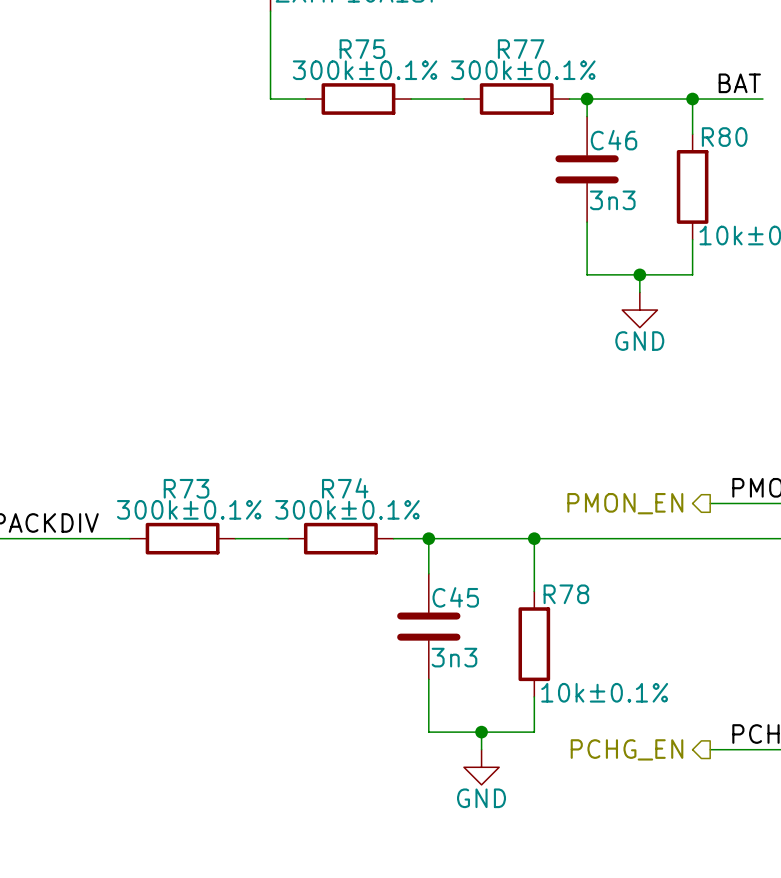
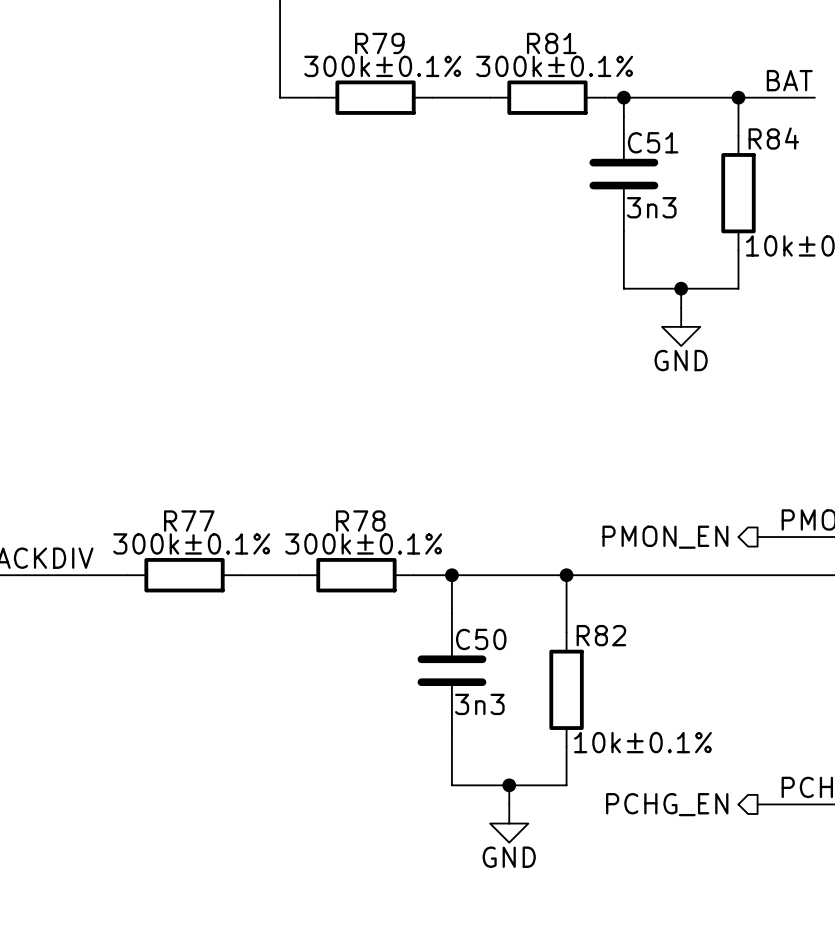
R75 name: R75 (362, 49) -> R79 (379, 43)
R77 name: R77 (521, 49) -> R81 (551, 43)
R80 name: R80 (724, 137) -> R84 (773, 138)
C46 name: C46 (614, 140) -> C51 (653, 142)
R73 name: R73 (186, 488) -> R77 (189, 521)
R74 name: R74 (345, 488) -> R78 (360, 521)
R78 name: R78 (566, 594) -> R82 (601, 635)
C45 name: C45 (455, 597) -> C50 (481, 639)

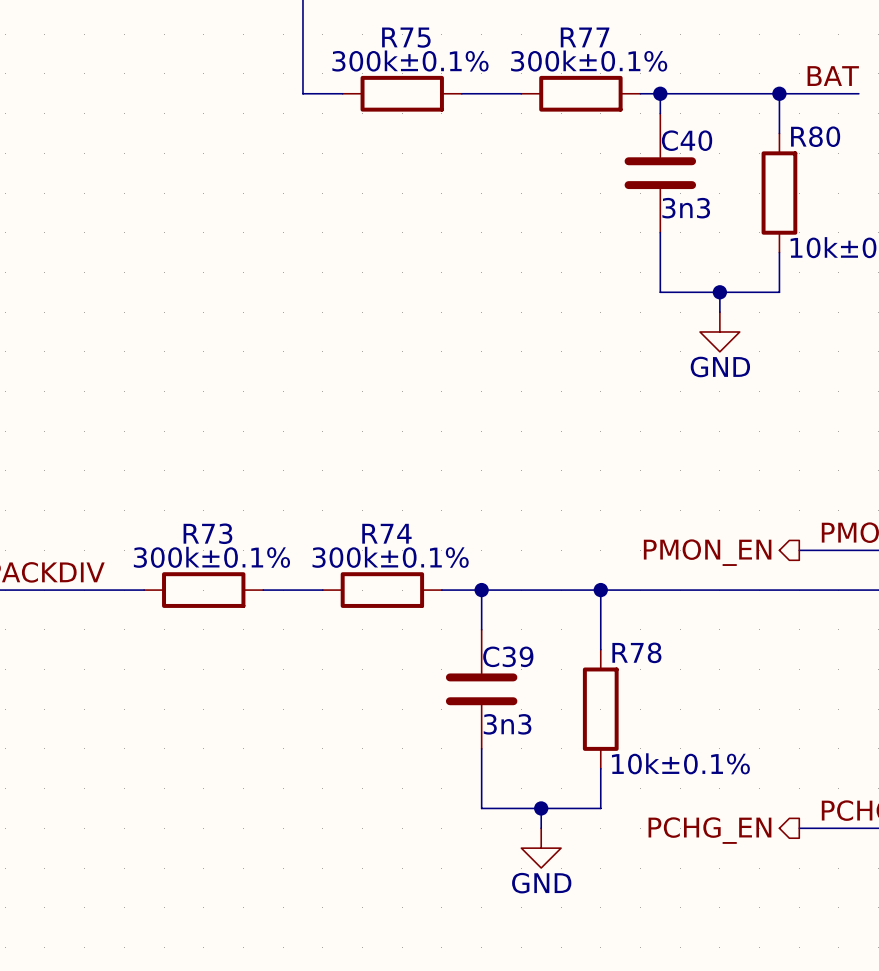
R79 name: R79 (379, 43) -> R75 (406, 37)
R81 name: R81 (551, 43) -> R77 (585, 37)
R84 name: R84 (773, 138) -> R80 (815, 136)
C51 name: C51 (653, 142) -> C40 (687, 140)
R77 name: R77 (189, 521) -> R73 (207, 533)
R78 name: R78 (360, 521) -> R74 (386, 533)
R82 name: R82 (601, 635) -> R78 (636, 652)
C50 name: C50 (481, 639) -> C39 (508, 656)

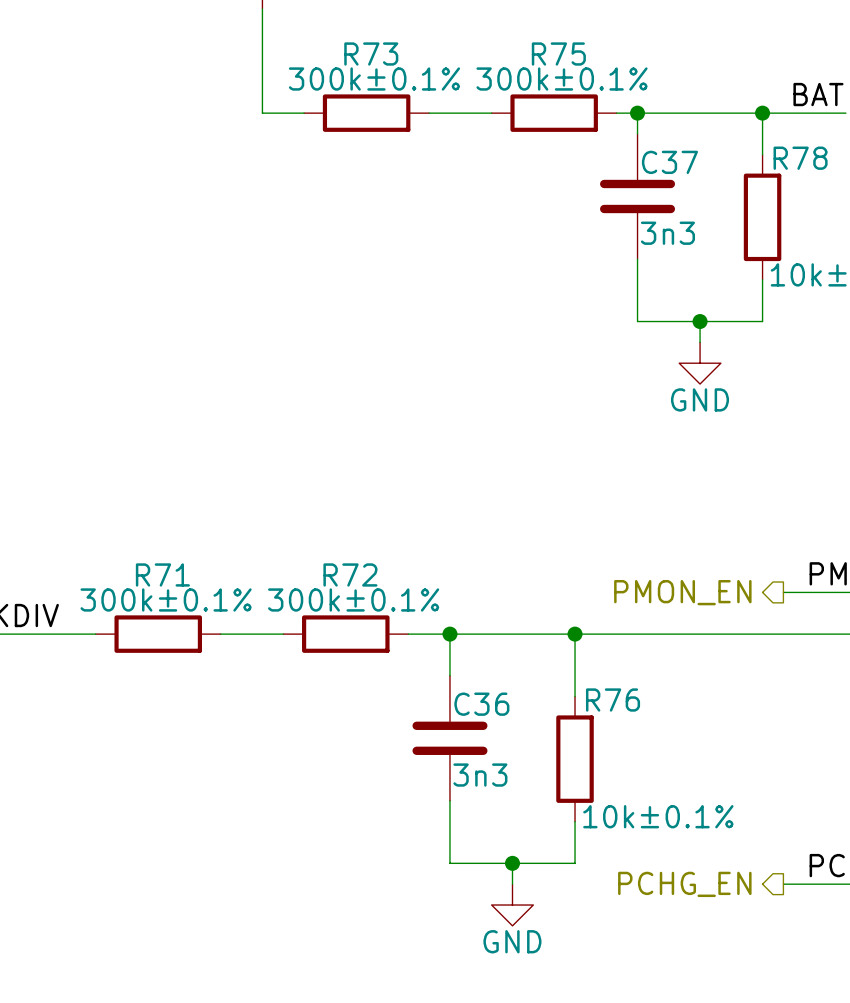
R75 name: R75 (406, 37) -> R73 (371, 54)
R77 name: R77 (585, 37) -> R75 (558, 54)
R80 name: R80 (815, 136) -> R78 (800, 158)
C40 name: C40 (687, 140) -> C37 (669, 162)
R73 name: R73 (207, 533) -> R71 (162, 574)
R74 name: R74 (386, 533) -> R72 (350, 574)
R78 name: R78 (636, 652) -> R76 (613, 700)
C39 name: C39 (508, 656) -> C36 (481, 704)

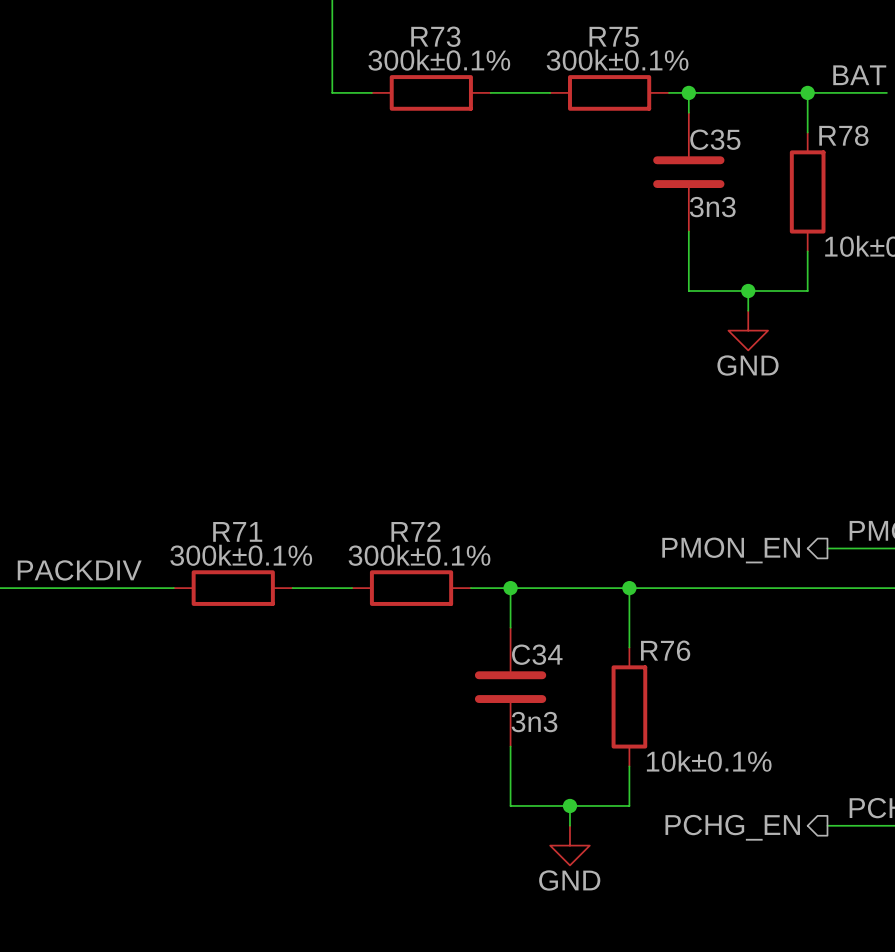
C37 name: C37 (669, 162) -> C35 (715, 139)
C36 name: C36 (481, 704) -> C34 (537, 654)

